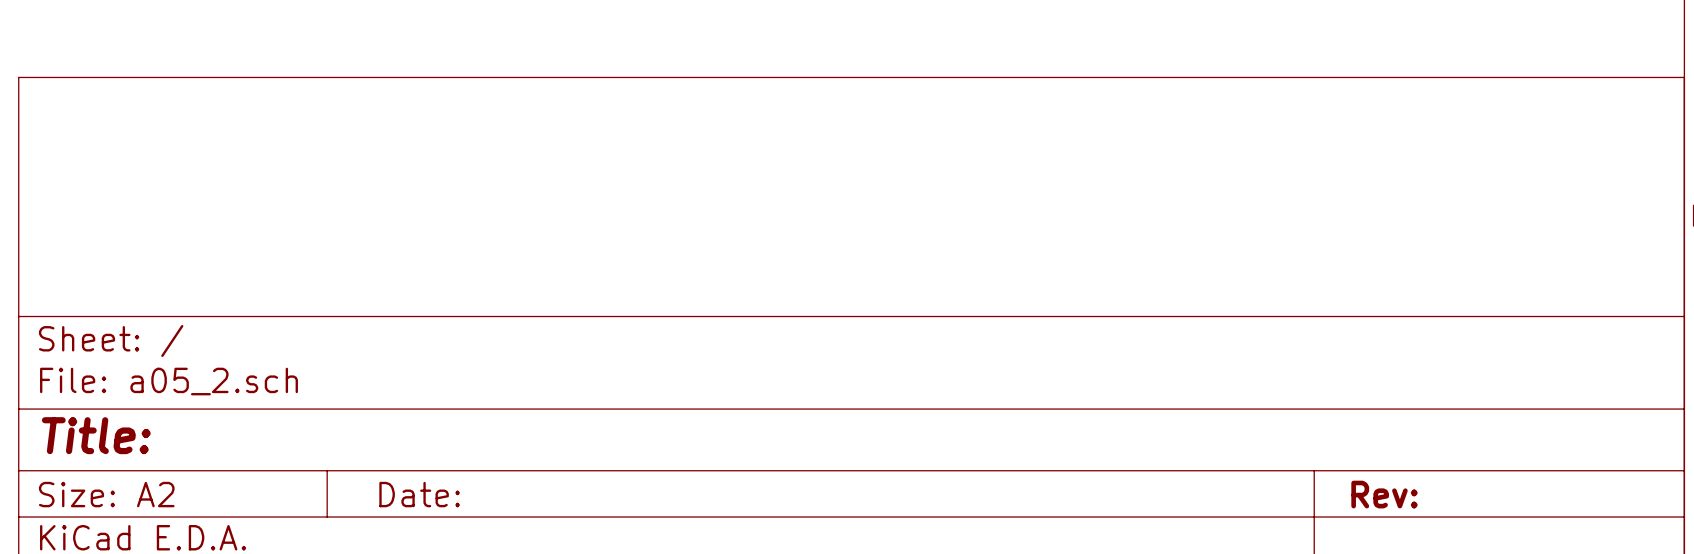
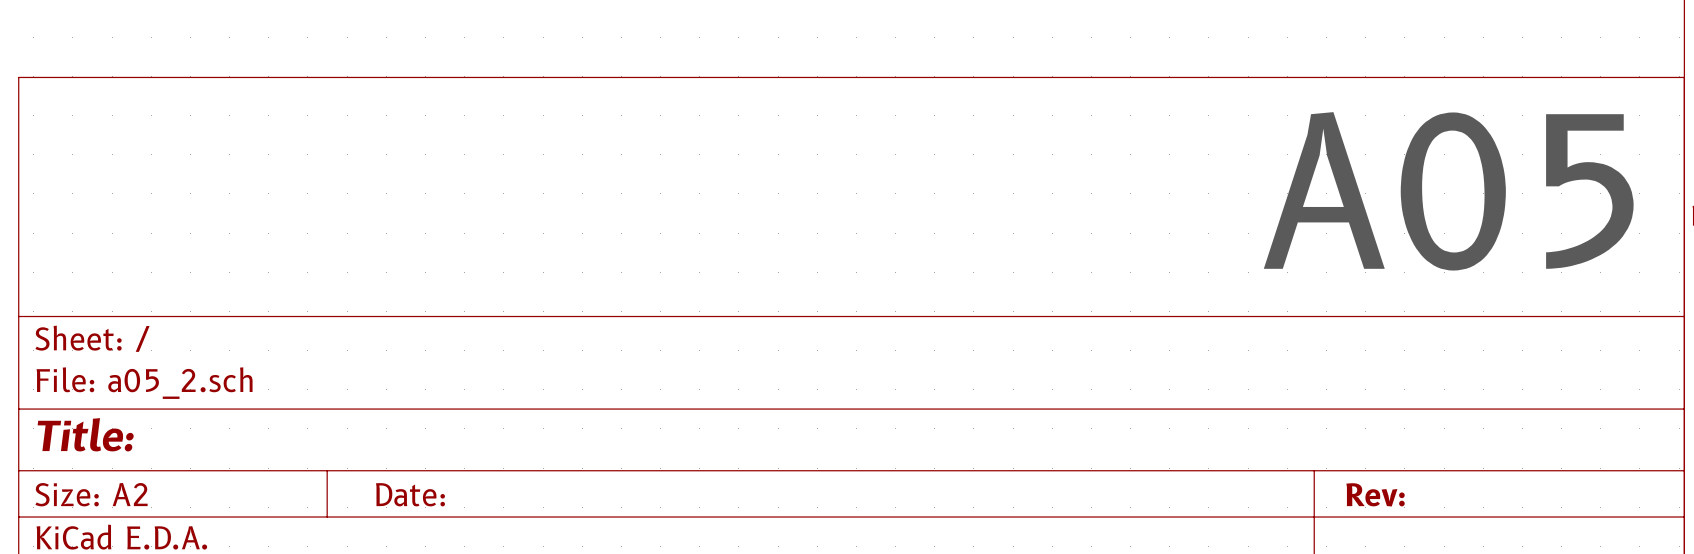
text: none -> A05 (1448, 191)

